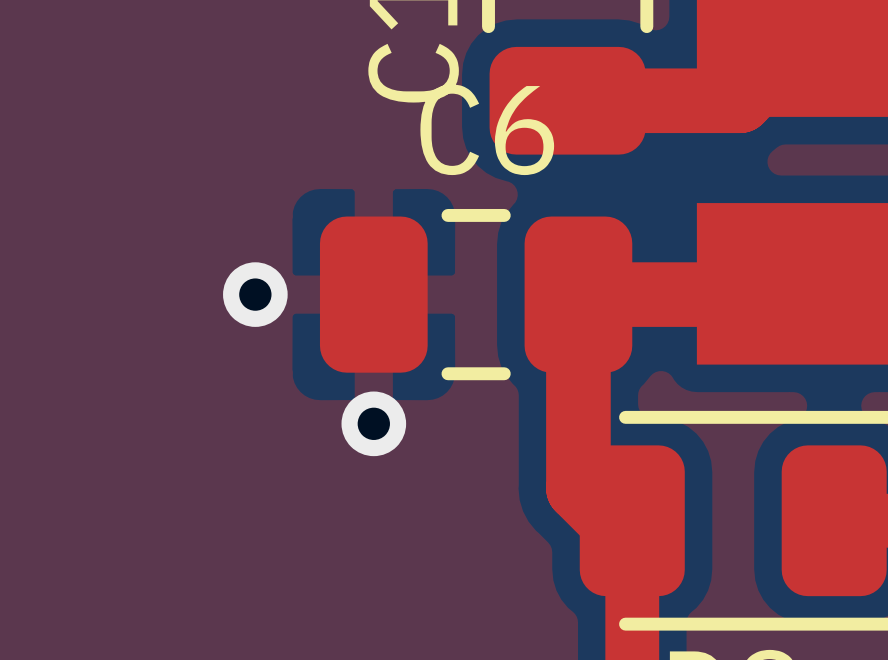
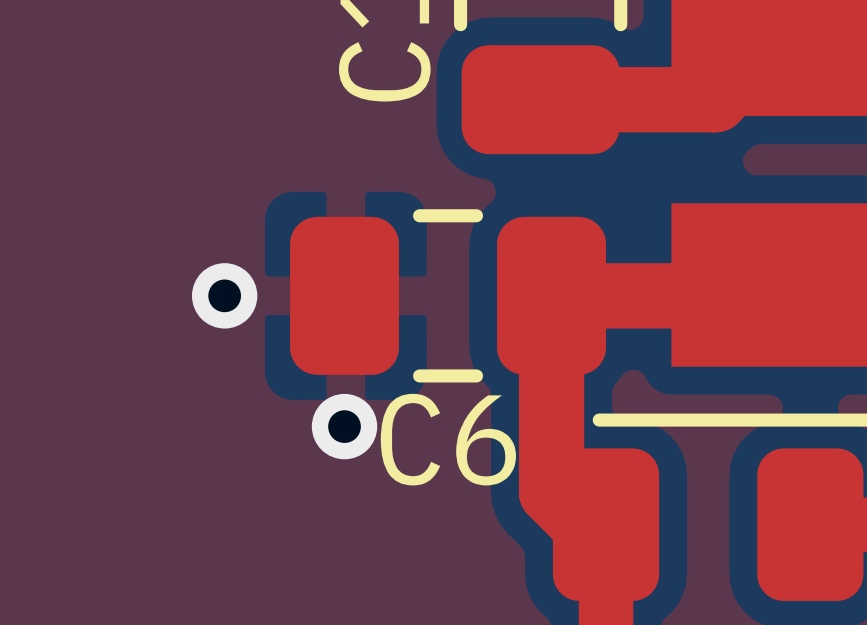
C6 name position: C6 (487, 129) -> C6 (448, 439)

